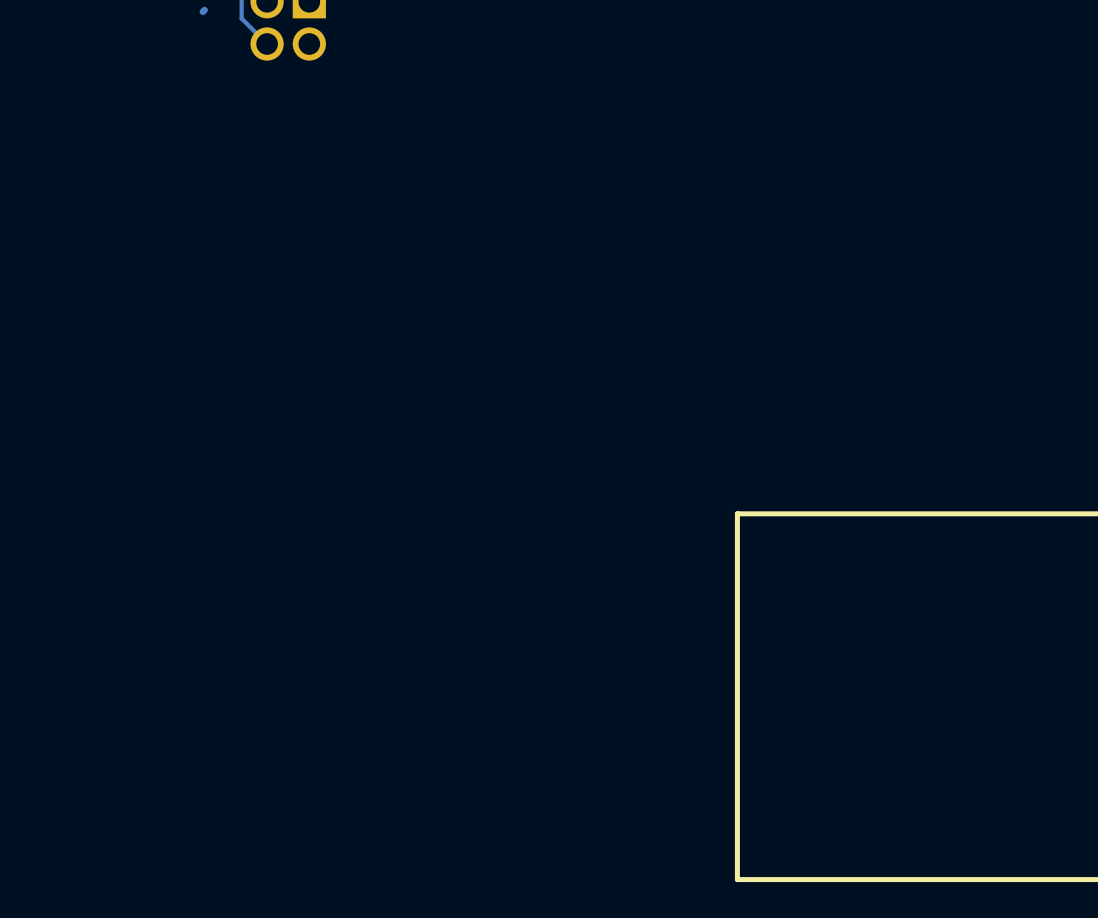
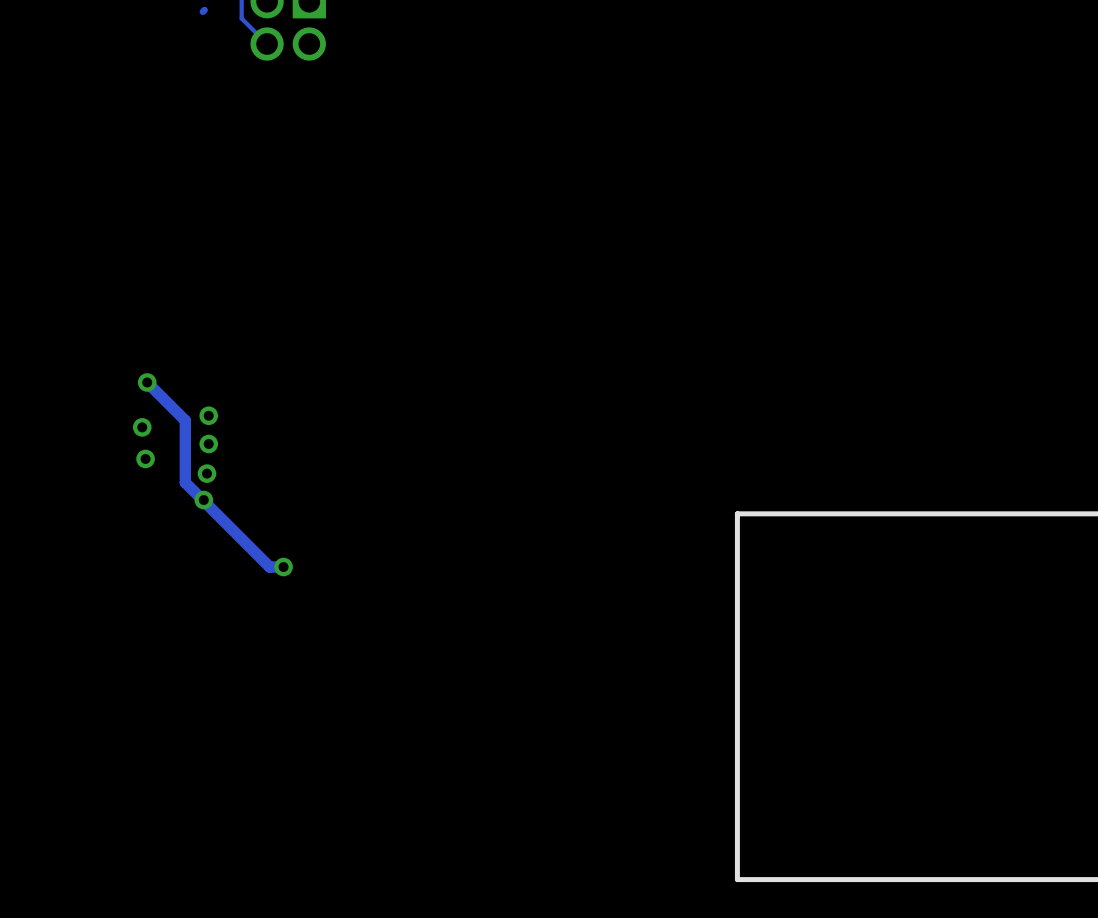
track: none -> (147, 382) (185, 420) (185, 482) (269, 567) (283, 567)
via: none -> (147, 382)
via: none -> (208, 415)
via: none -> (142, 427)
via: none -> (208, 444)
via: none -> (145, 458)
via: none -> (206, 473)
via: none -> (203, 500)
via: none -> (283, 567)

